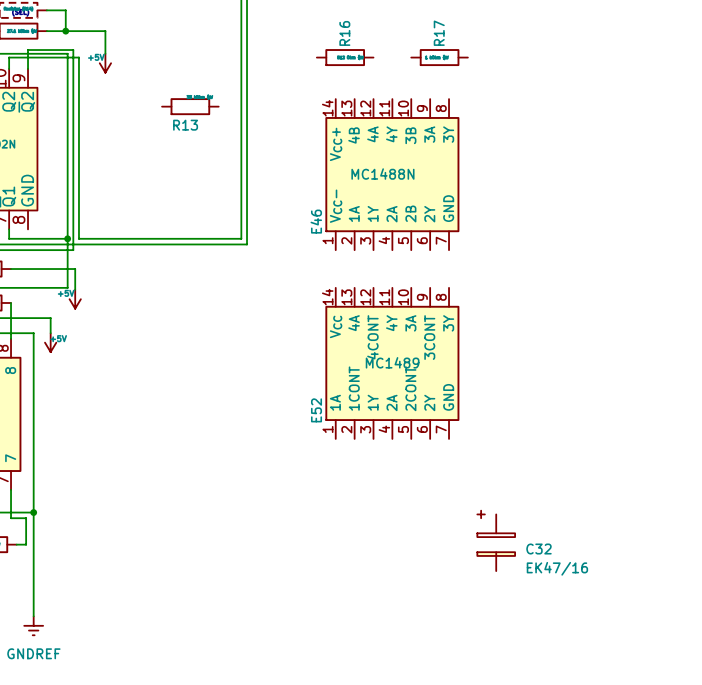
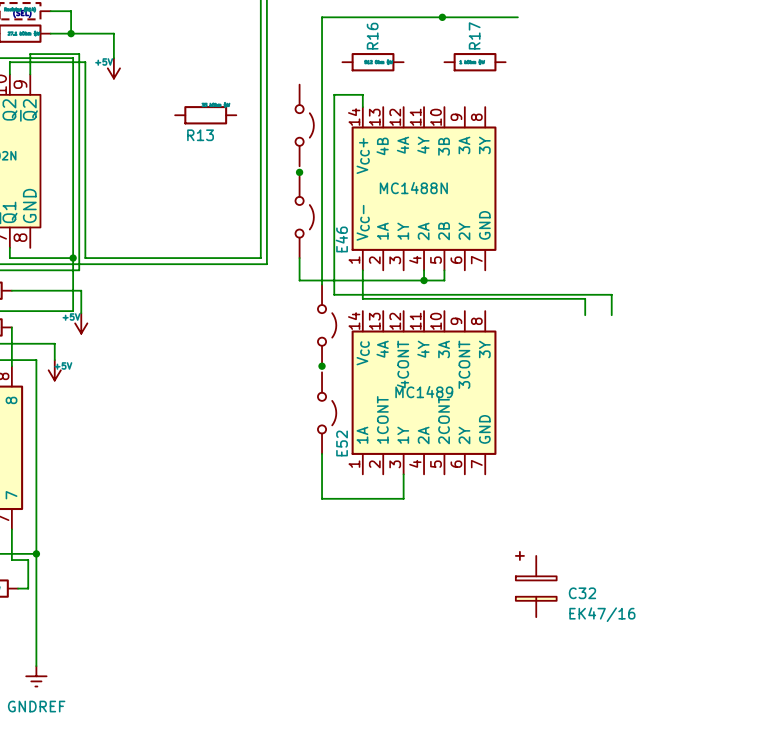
junction: none -> (442, 17)
wire: none -> (517, 17) (322, 17) (322, 284)
wire: none -> (362, 107) (362, 94) (334, 94) (334, 294) (611, 294) (611, 315)
part: none -> (304, 125)
junction: none -> (299, 172)
part: none -> (304, 217)
wire: none -> (299, 258) (299, 280) (444, 280) (444, 270)
wire: none -> (362, 270) (362, 298) (585, 298) (585, 315)
wire: none -> (424, 270) (424, 280)
junction: none -> (424, 280)
part: none -> (327, 325)
junction: none -> (322, 366)
part: none -> (327, 413)
wire: none -> (322, 453) (322, 498) (403, 498) (403, 474)

